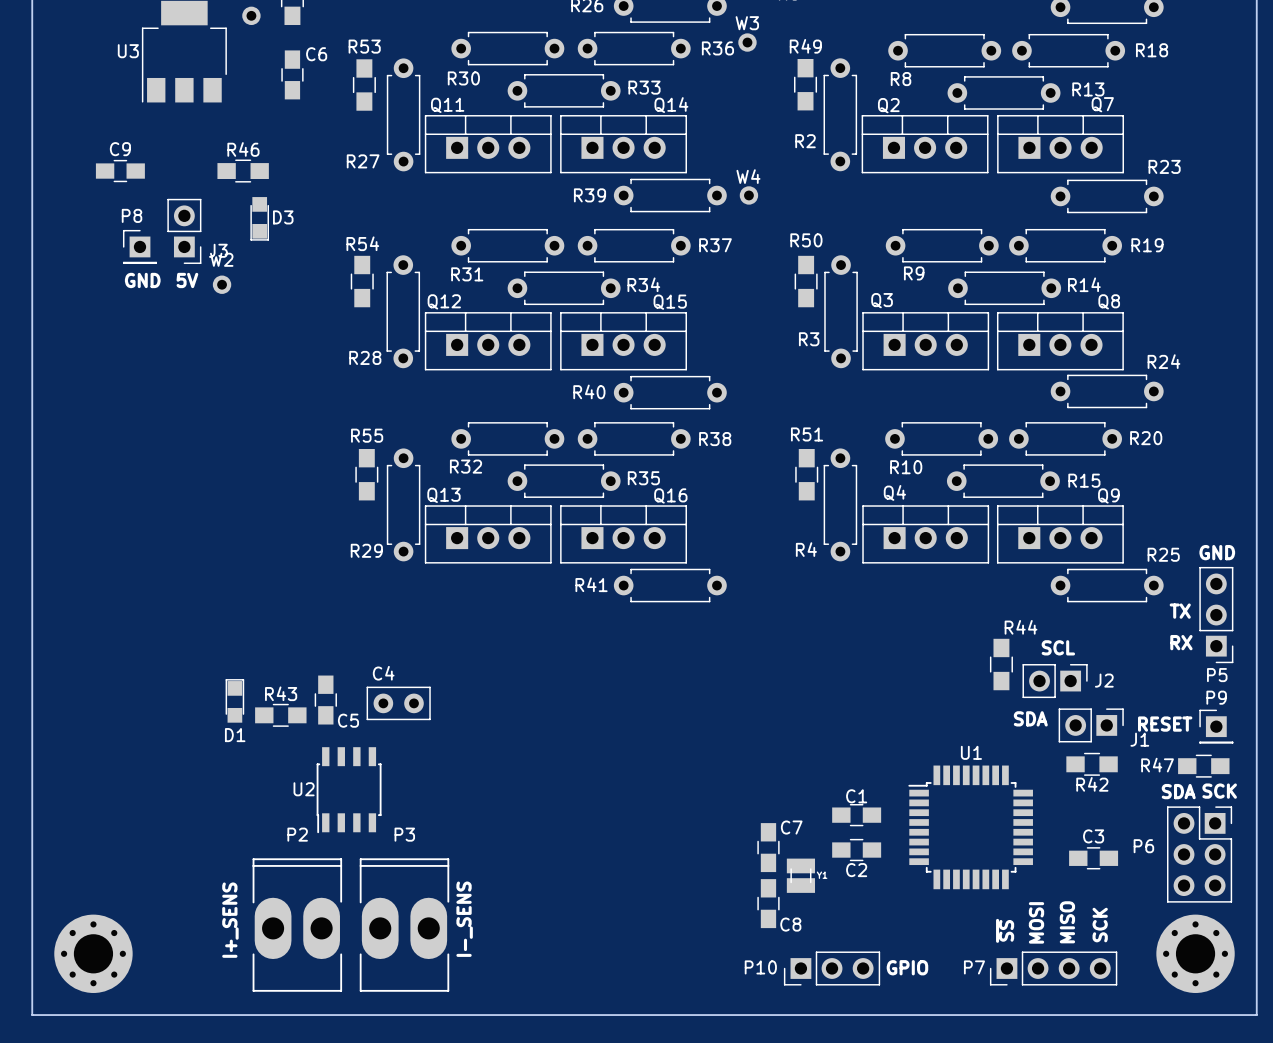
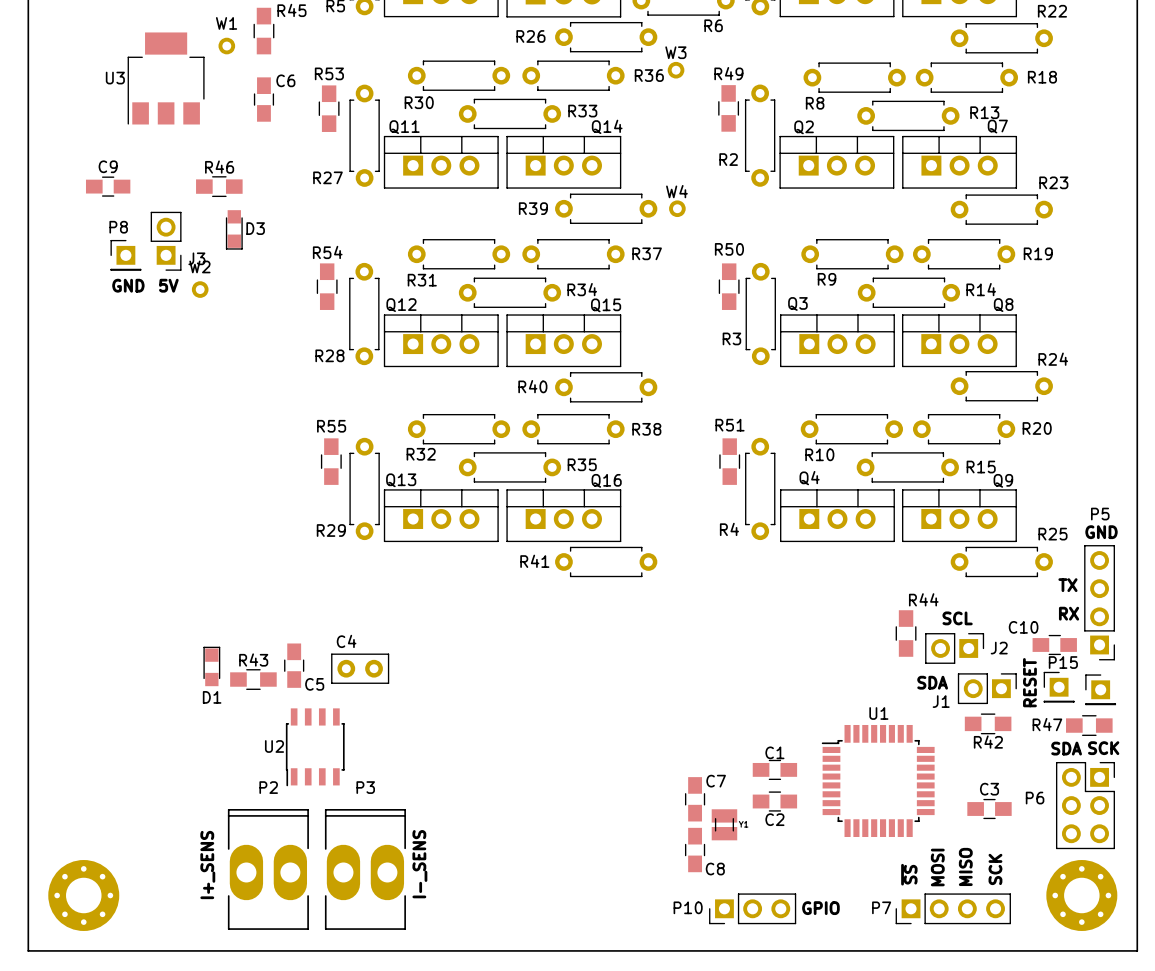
P5 footprint: [1199, 566, 1234, 664] -> [1084, 545, 1115, 661]
P5 name position: P5 (1217, 675) -> P5 (1100, 514)
C10: none -> (1054, 644)
P9 name: P9 (1216, 697) -> P15 (1063, 662)
part: none -> (1059, 687)
text rotation: 0° (1165, 724) -> 90° counterclockwise (1029, 682)
J1 name position: J1 (1139, 739) -> J1 (941, 701)

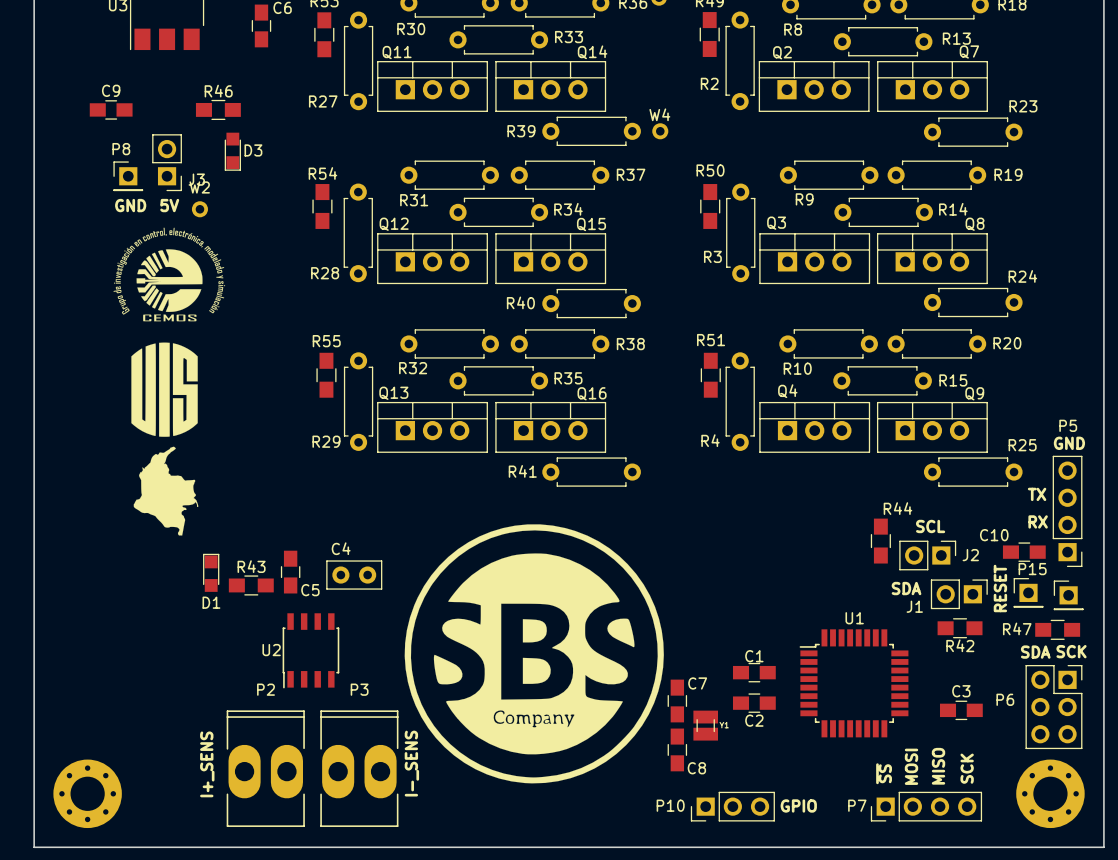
drawing: none -> [113, 227, 226, 322]
drawing: none -> [131, 342, 199, 536]
drawing: none -> [404, 524, 664, 784]

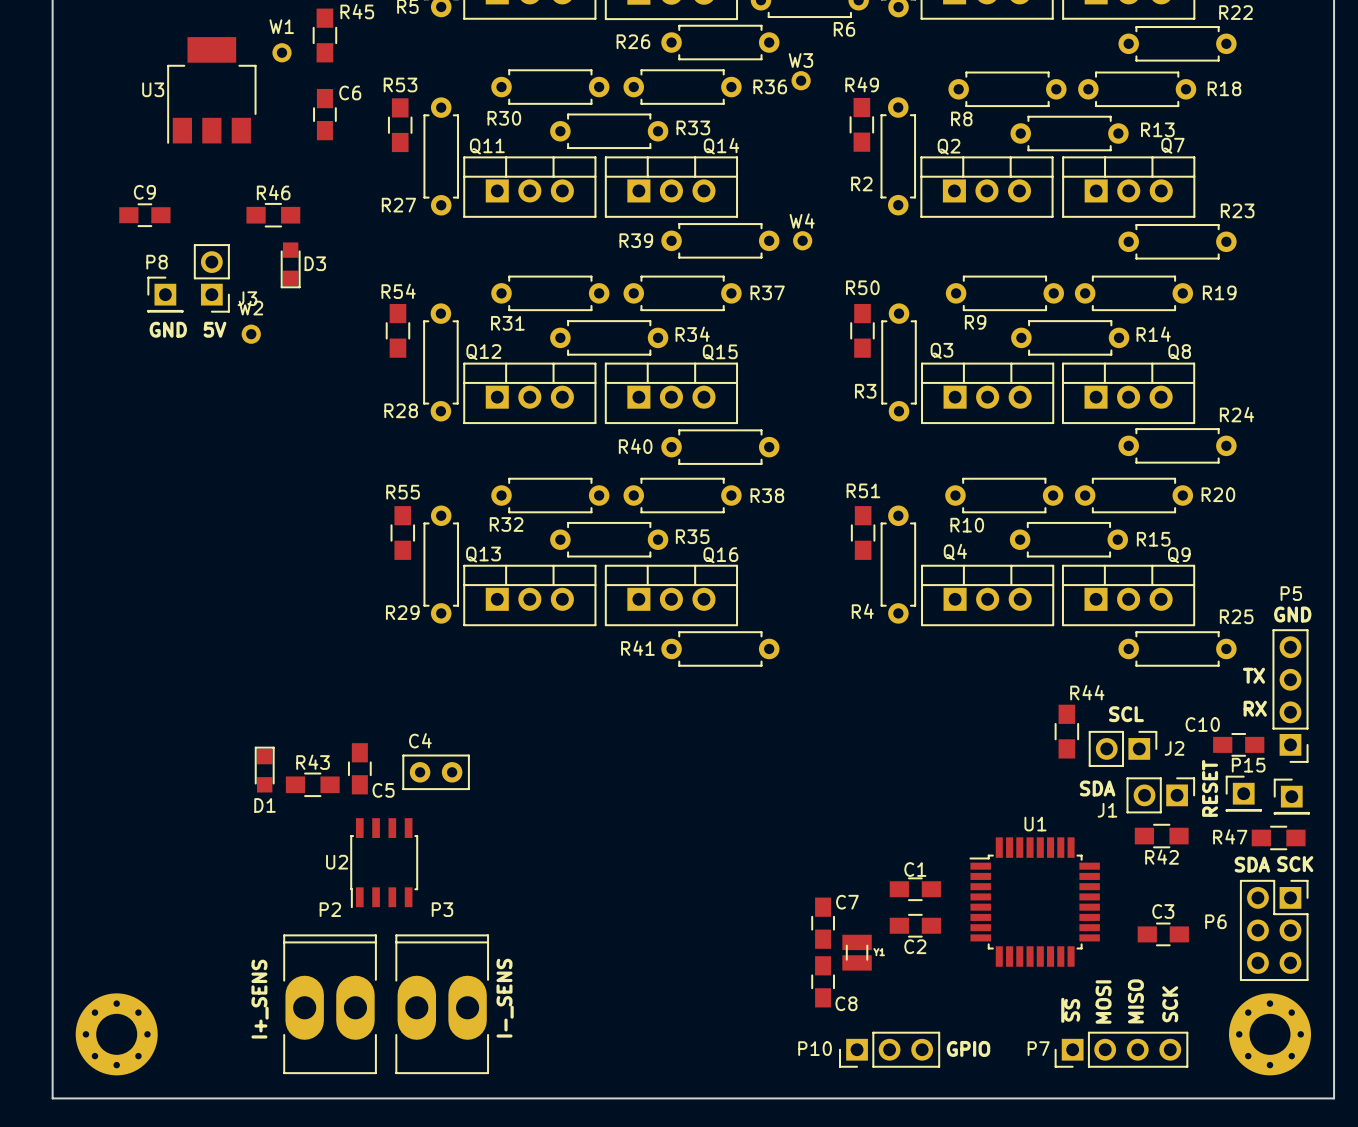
drawing: [113, 227, 226, 322] -> none
drawing: [131, 342, 199, 536] -> none
drawing: [404, 524, 664, 784] -> none

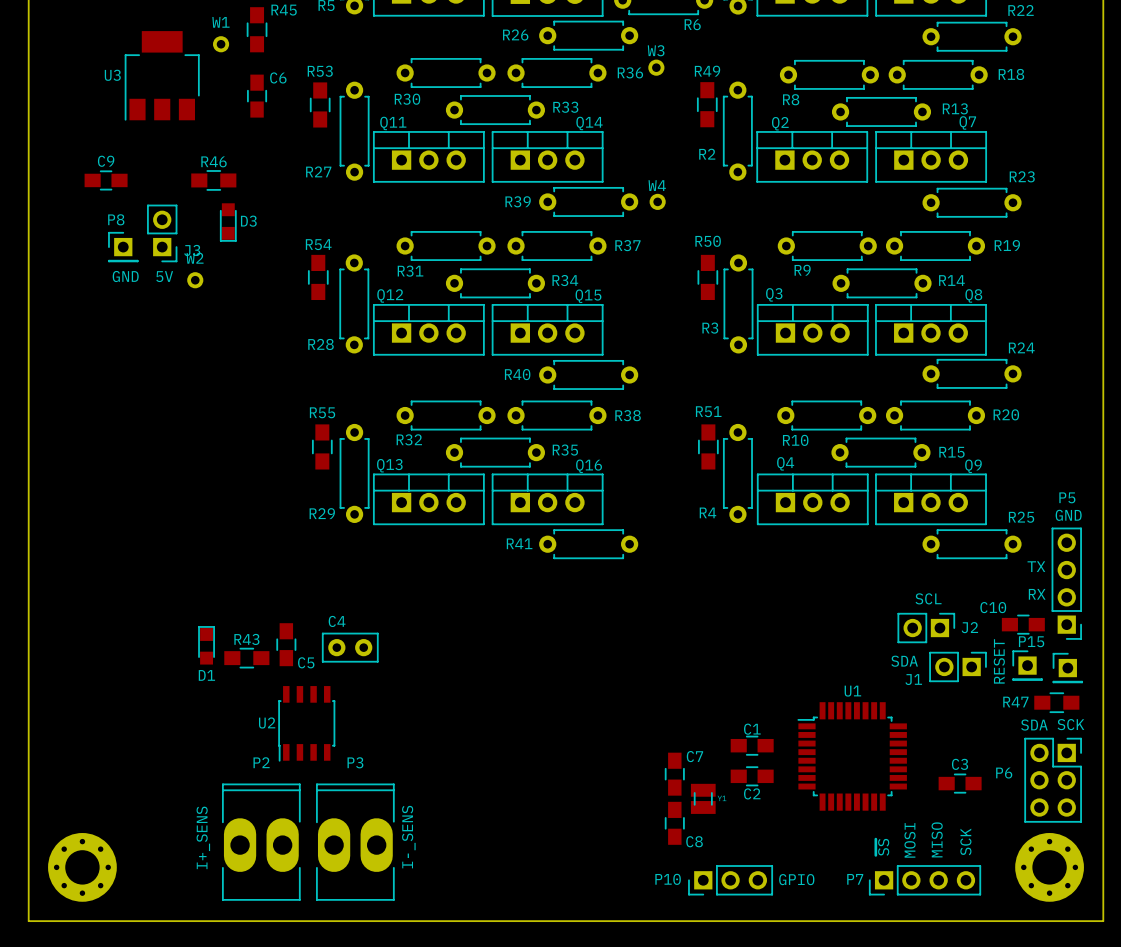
R44: (1066, 731) -> none
R42: (1161, 836) -> none

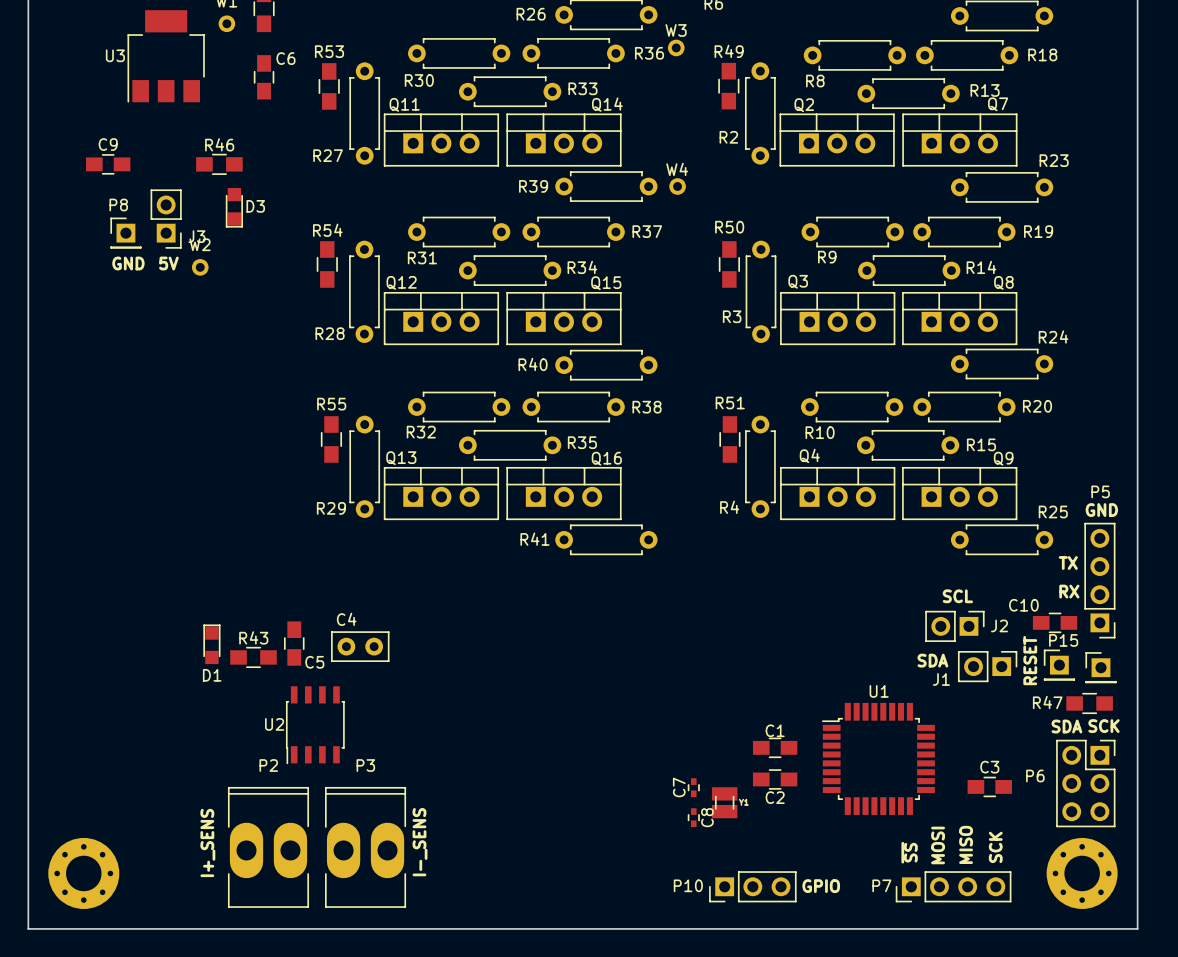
C7 footprint: [665, 752, 685, 796] -> [687, 778, 700, 798]
C7 name position: C7 (694, 756) -> C7 (679, 787)
C8 footprint: [665, 801, 685, 845] -> [687, 808, 700, 828]

